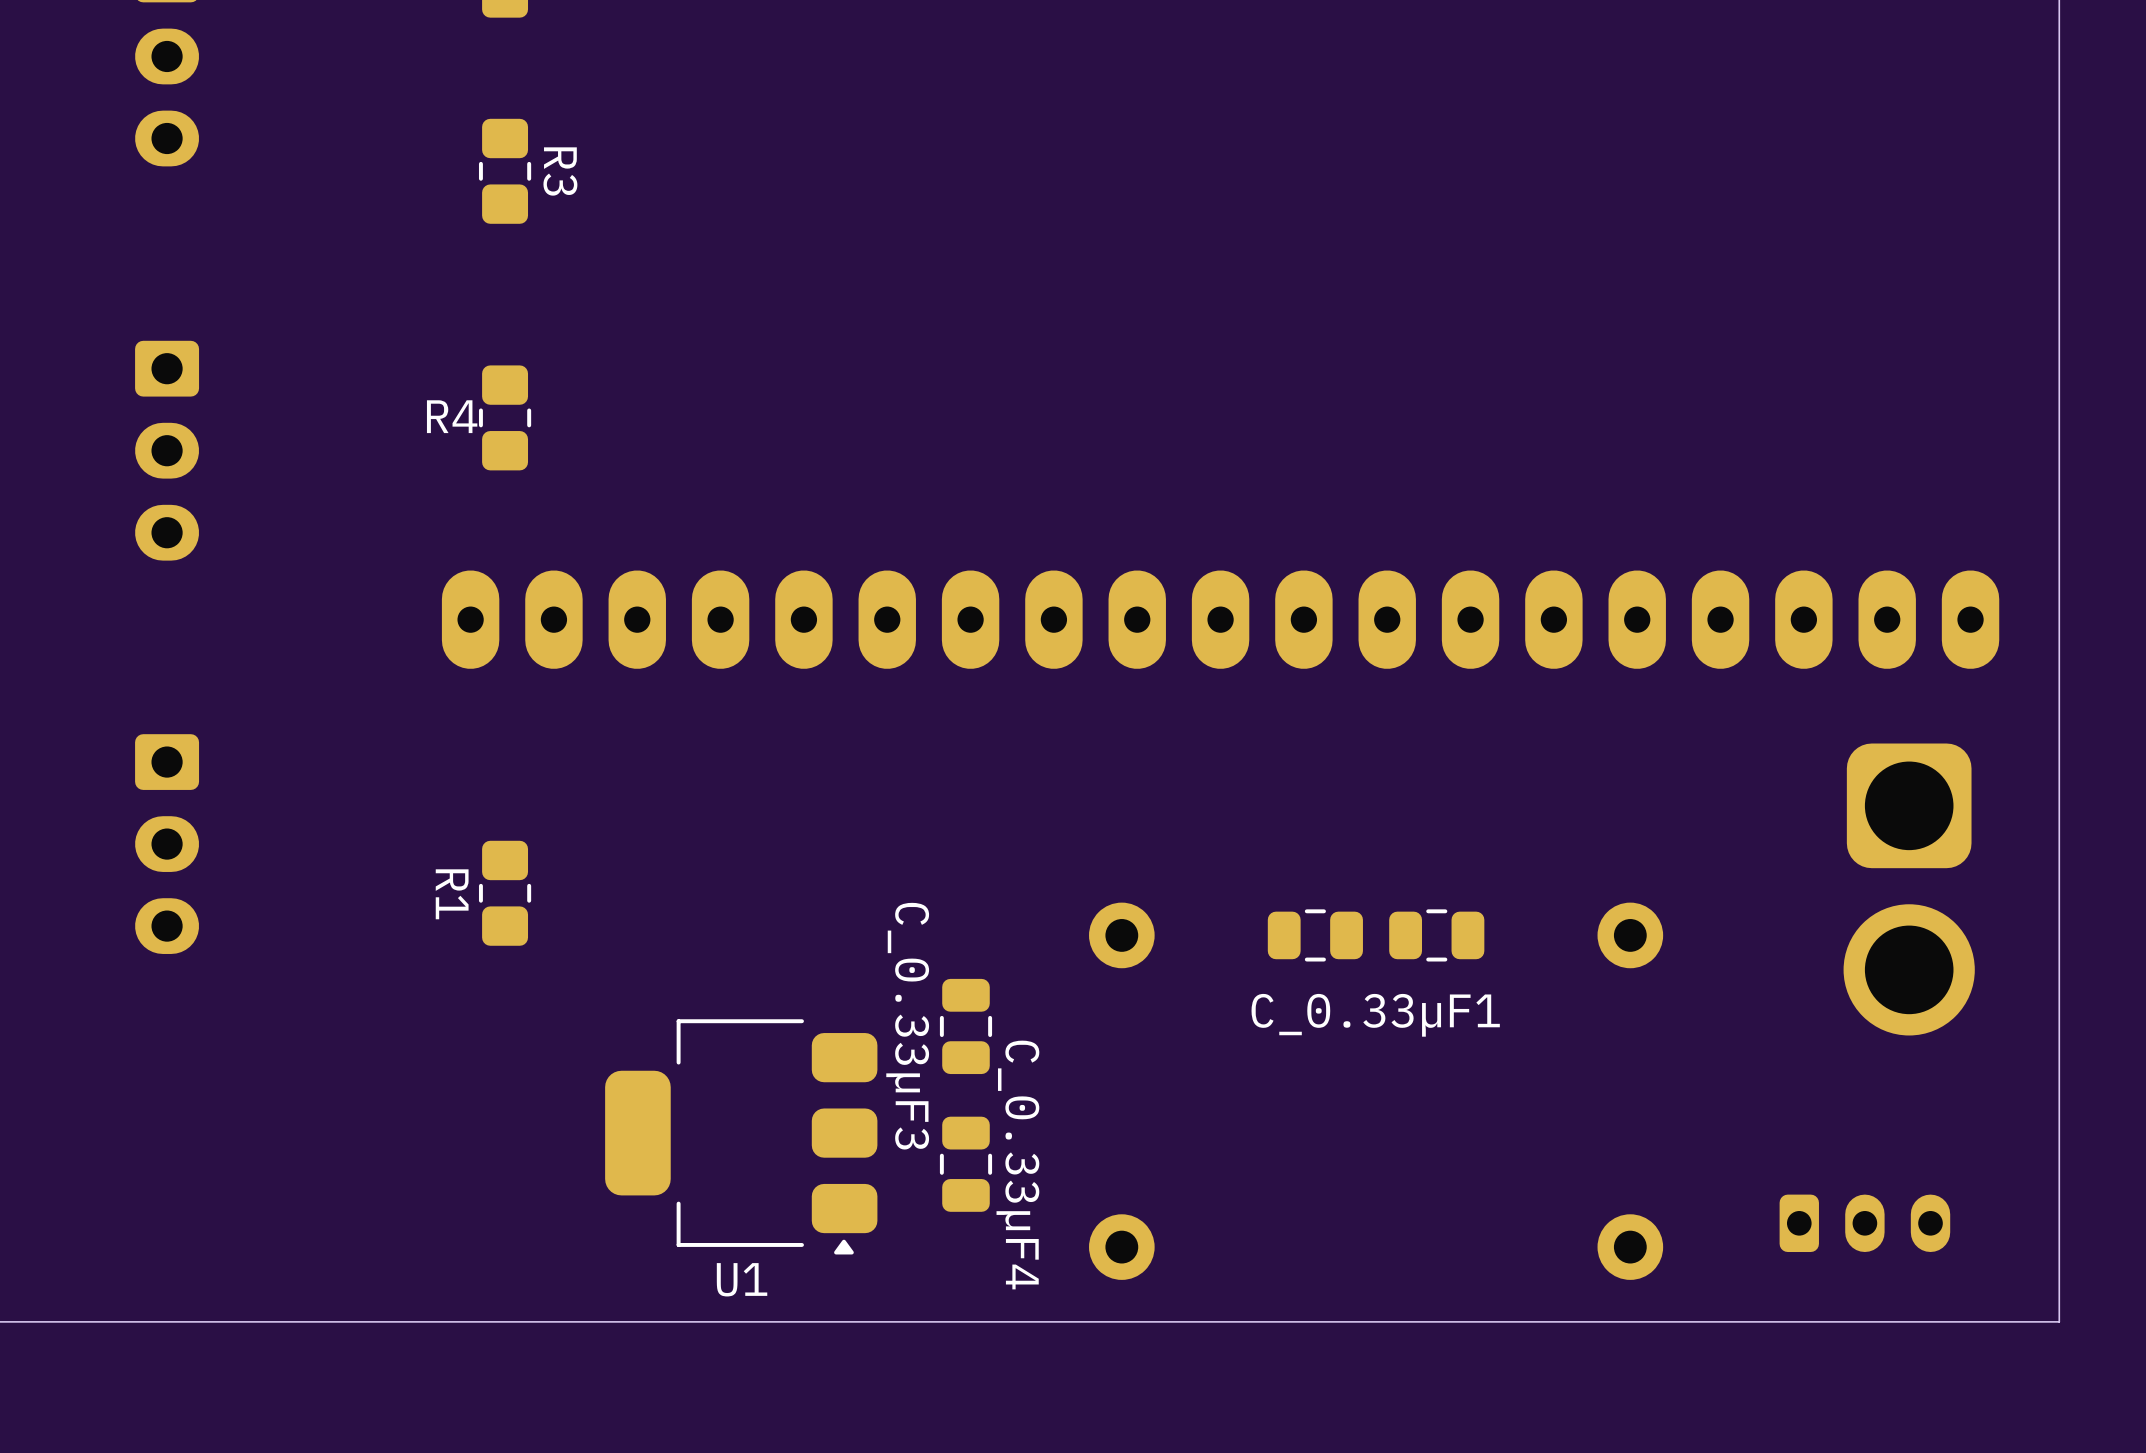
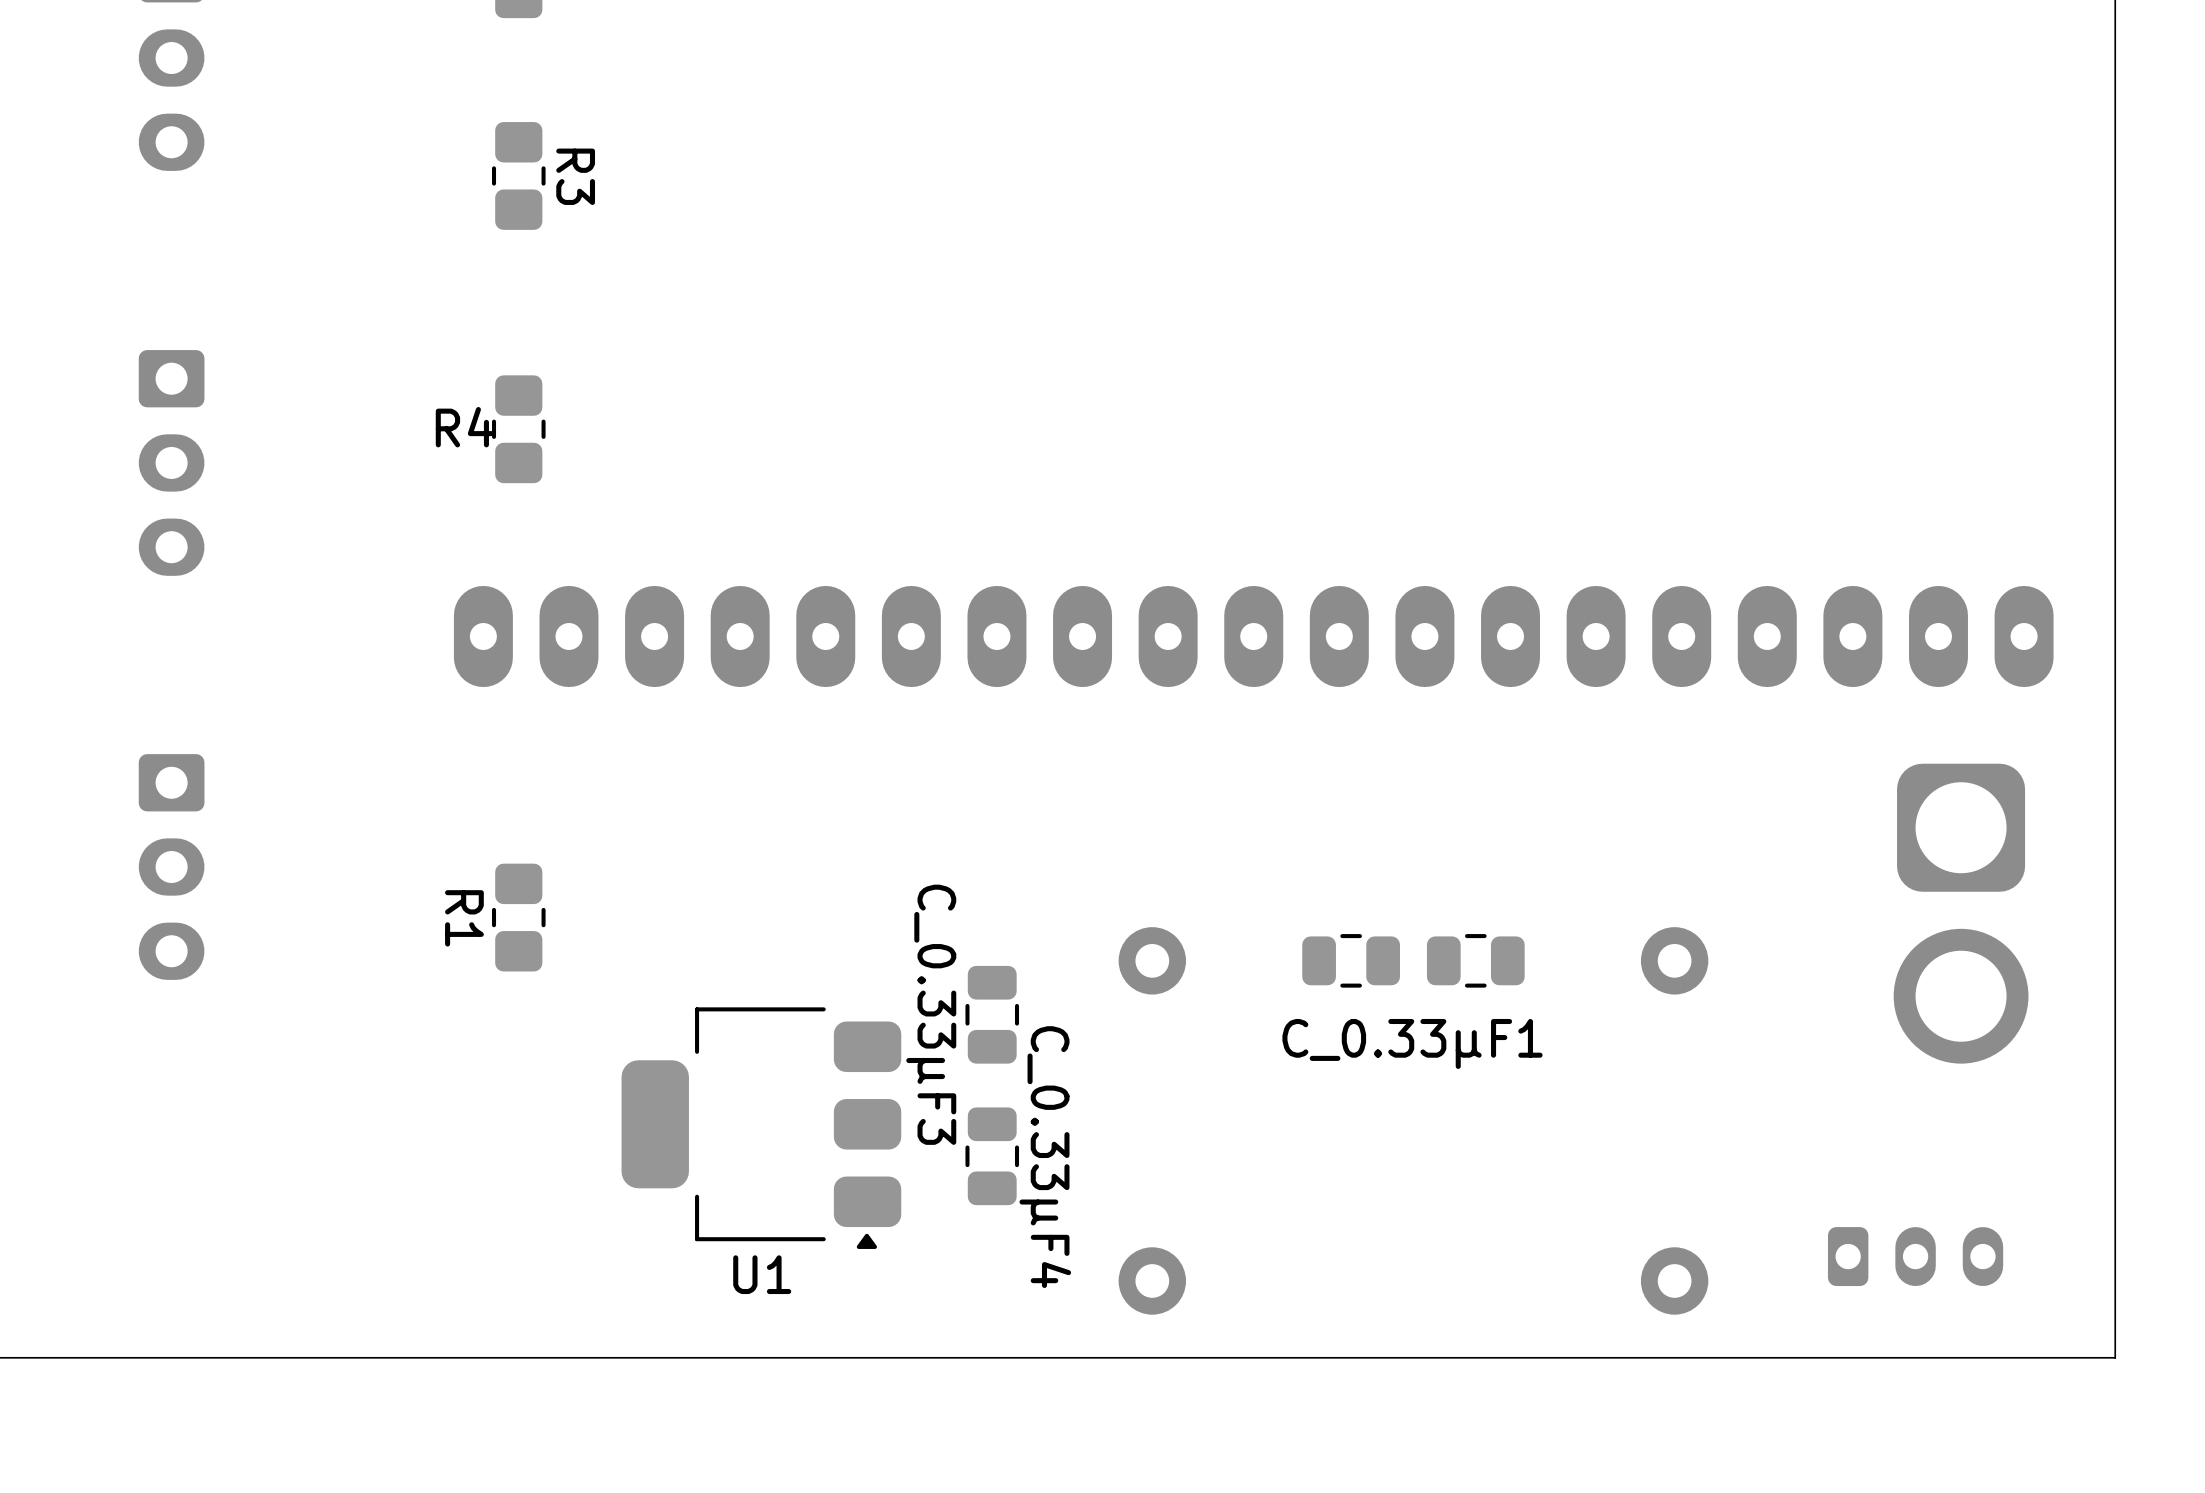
C_0.33µF3 position: (965, 1026) -> (992, 1014)
U1 position: (741, 1136) -> (761, 1128)
C_0.33µF4 position: (965, 1164) -> (992, 1156)

